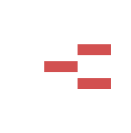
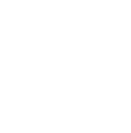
part: (77, 66) -> none

